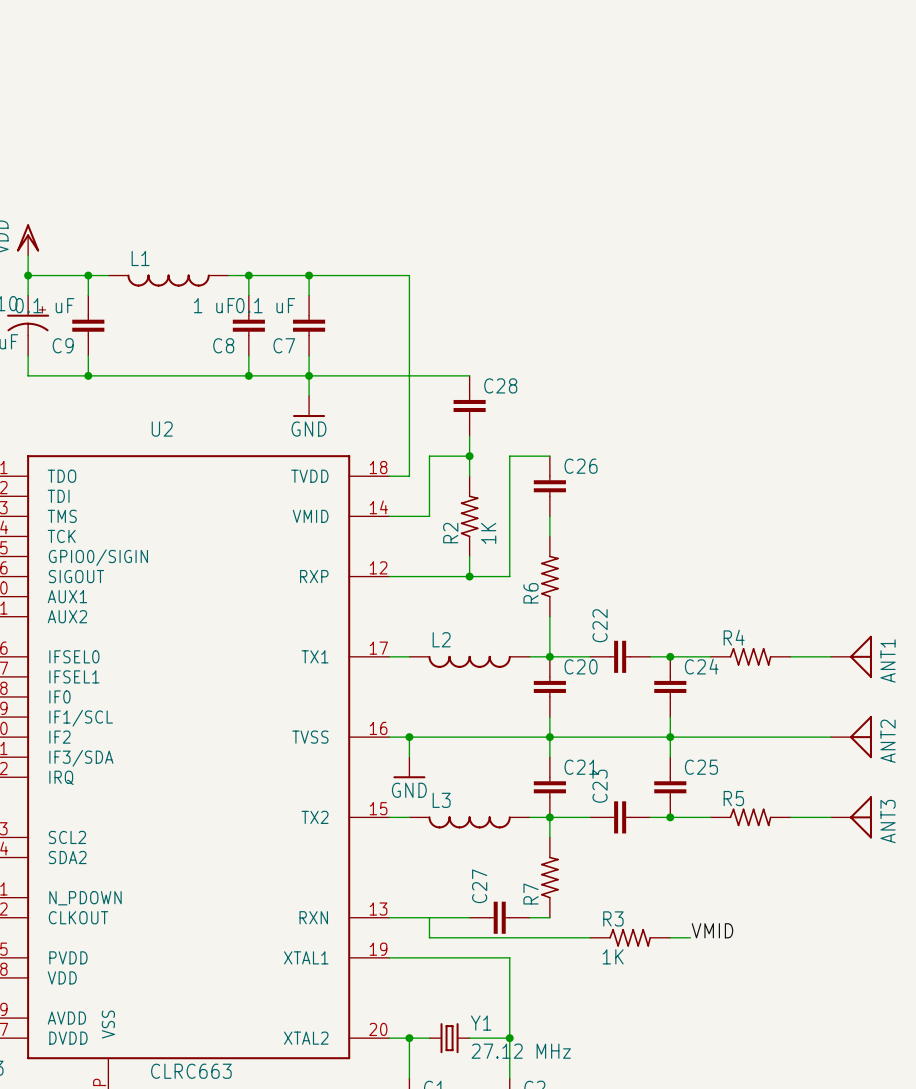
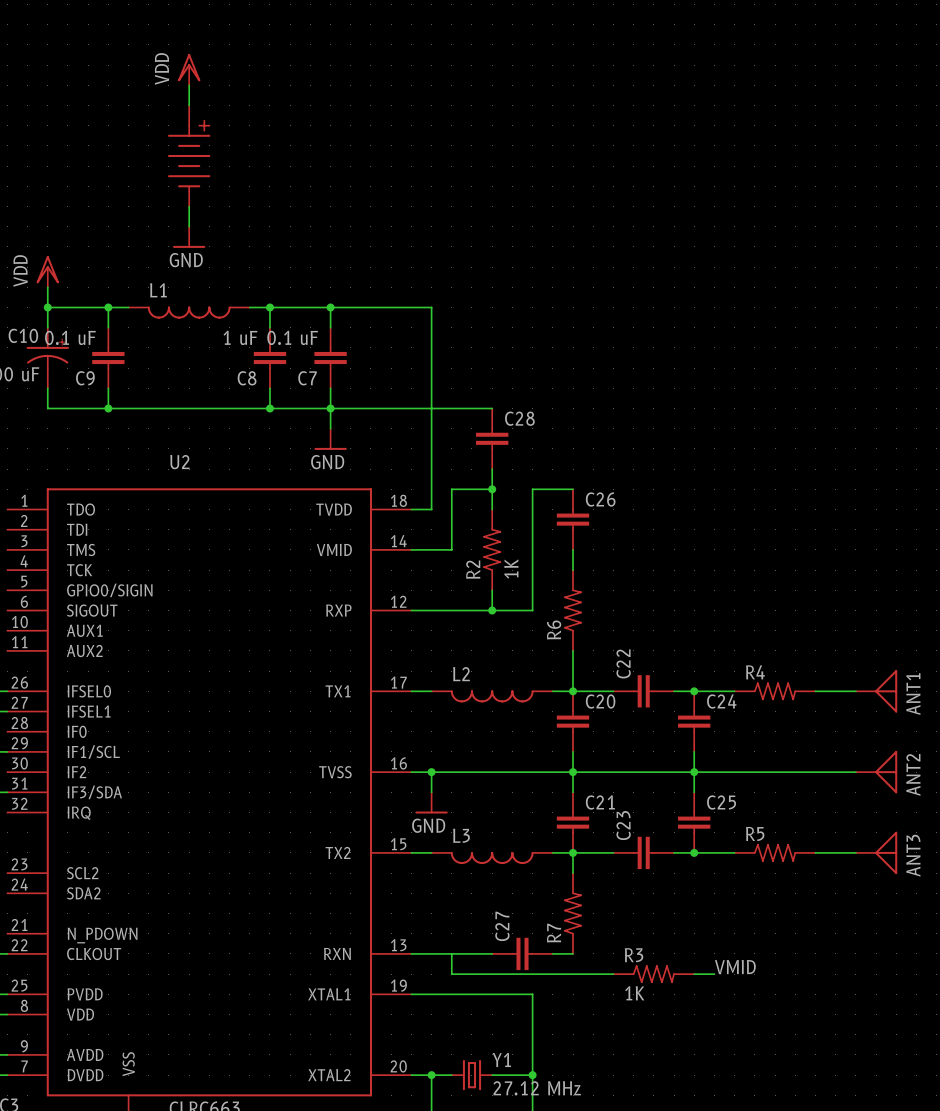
power symbol: none -> VDD (189, 69)
wire: none -> (189, 85) (189, 105)
part: none -> (189, 155)
wire: none -> (189, 206) (189, 226)
power symbol: none -> GND (189, 237)

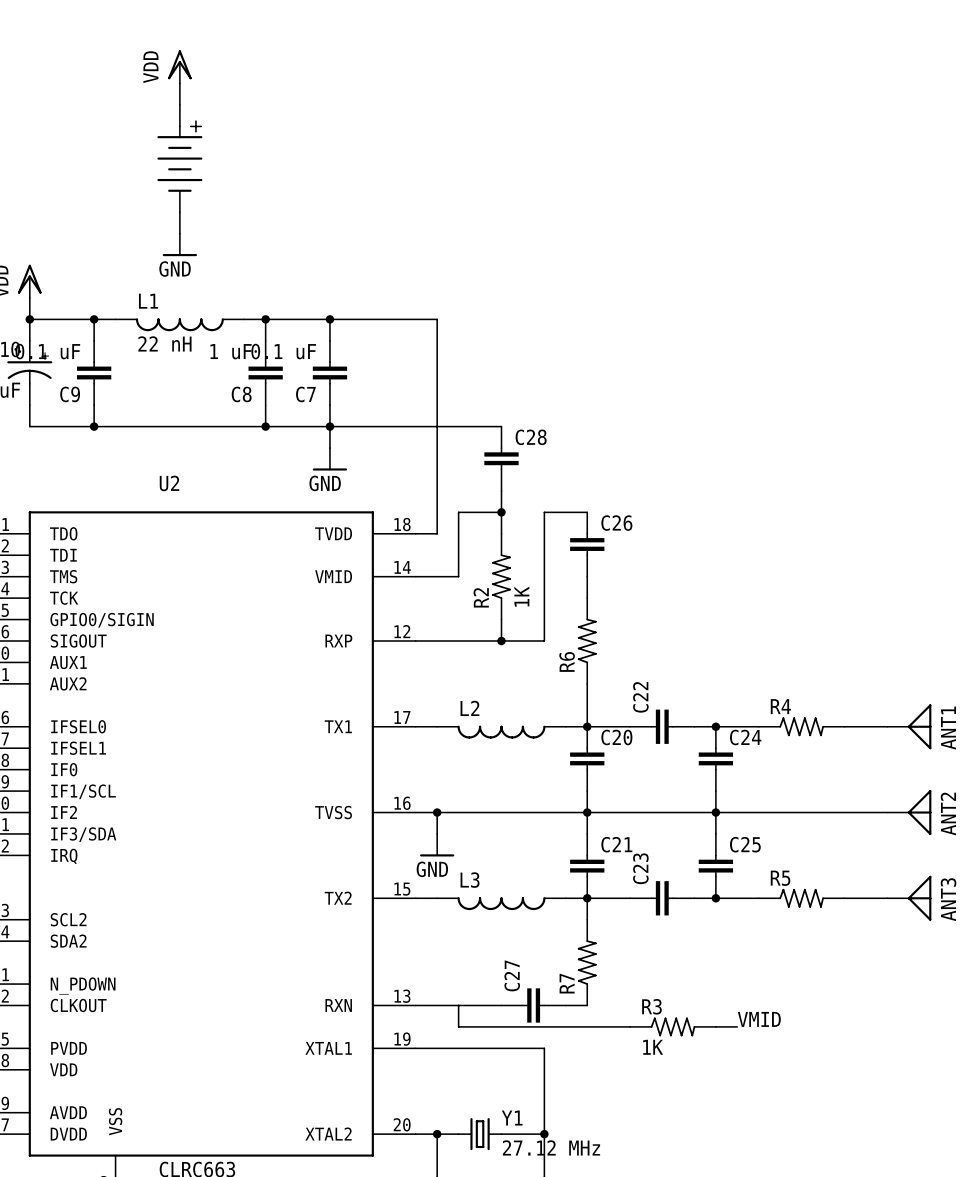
L1 value: none -> 22 nH (164, 343)

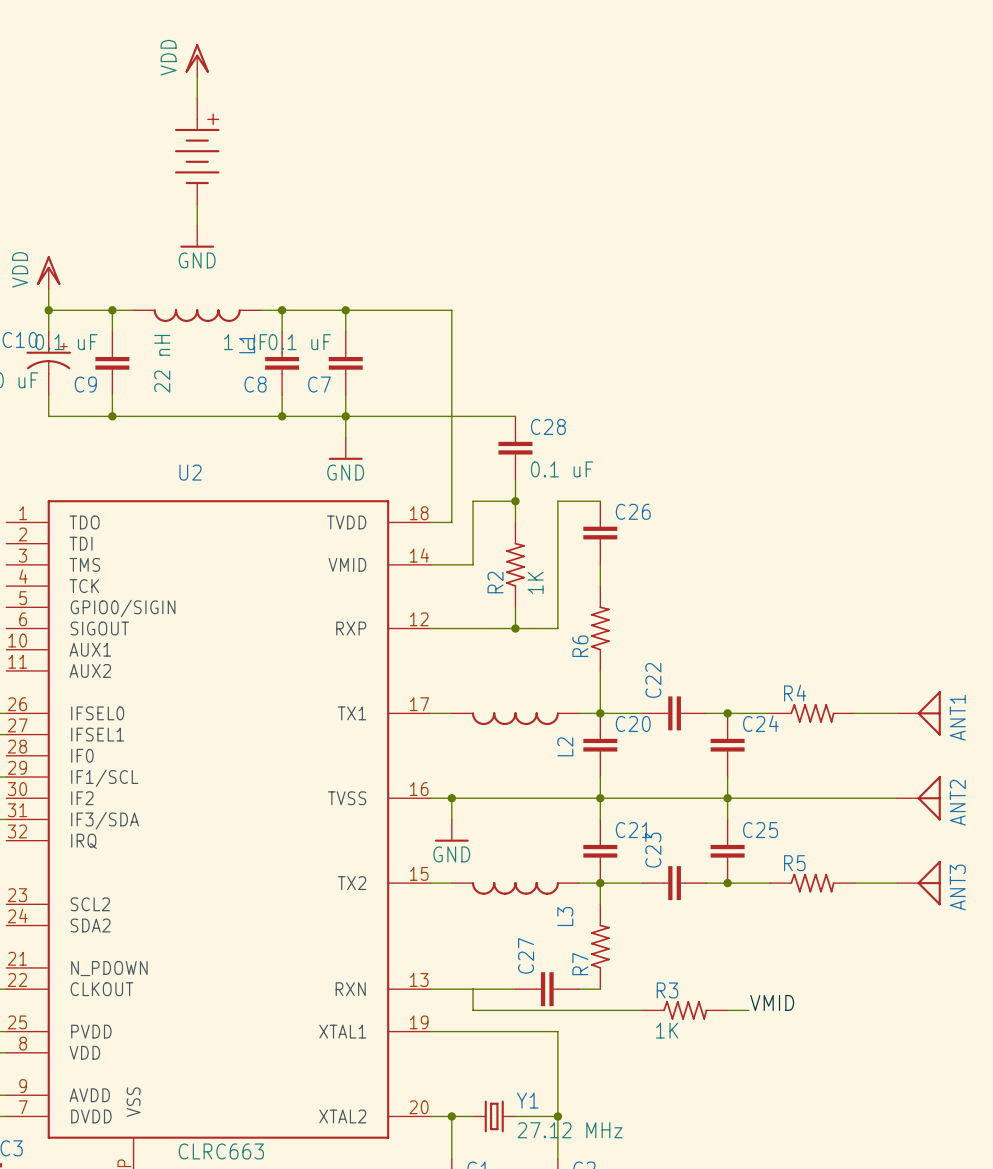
L1 name rotation: 0° (148, 301) -> 90° counterclockwise (247, 343)
L1 name position: L1 (148, 301) -> L1 (247, 343)
L1 value rotation: 0° (164, 343) -> 90° counterclockwise (162, 363)
C28 value: none -> 0.1 uF (562, 469)
L2 name rotation: 0° (469, 708) -> 90° counterclockwise (565, 746)
L2 name position: L2 (469, 708) -> L2 (565, 746)
L3 name rotation: 0° (470, 880) -> 90° counterclockwise (565, 916)
L3 name position: L3 (470, 880) -> L3 (565, 916)

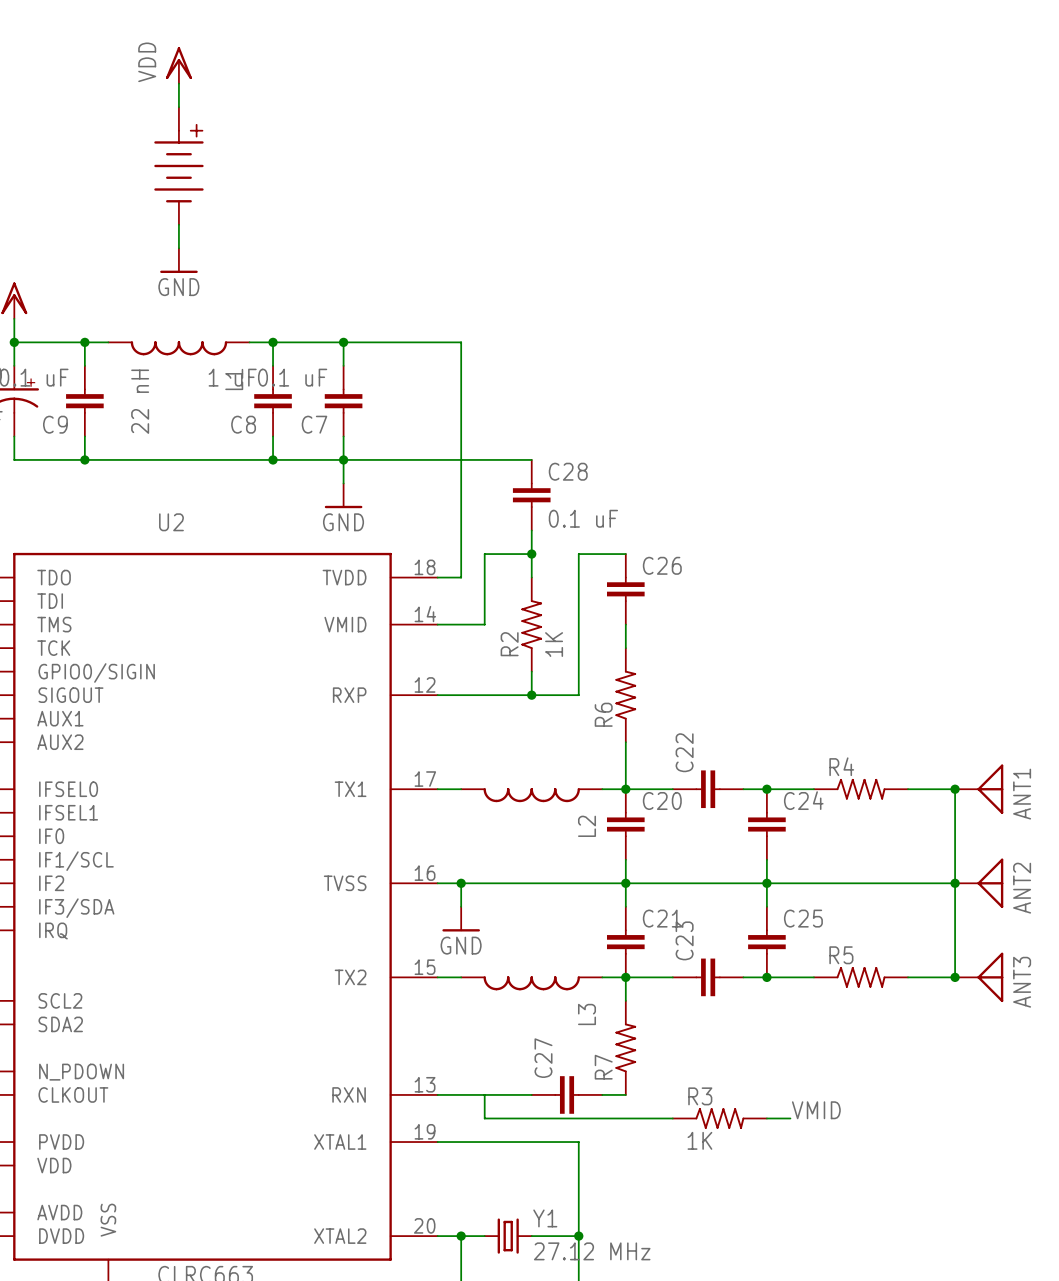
wire: none -> (955, 789) (955, 977)
junction: none -> (955, 789)
junction: none -> (955, 883)
junction: none -> (955, 977)

